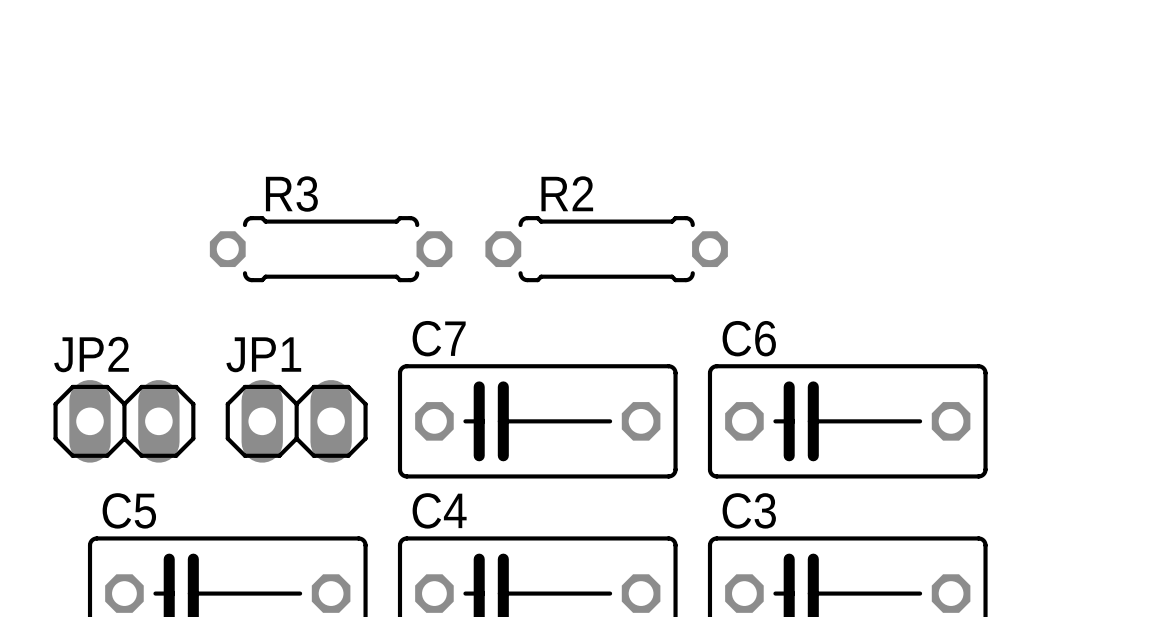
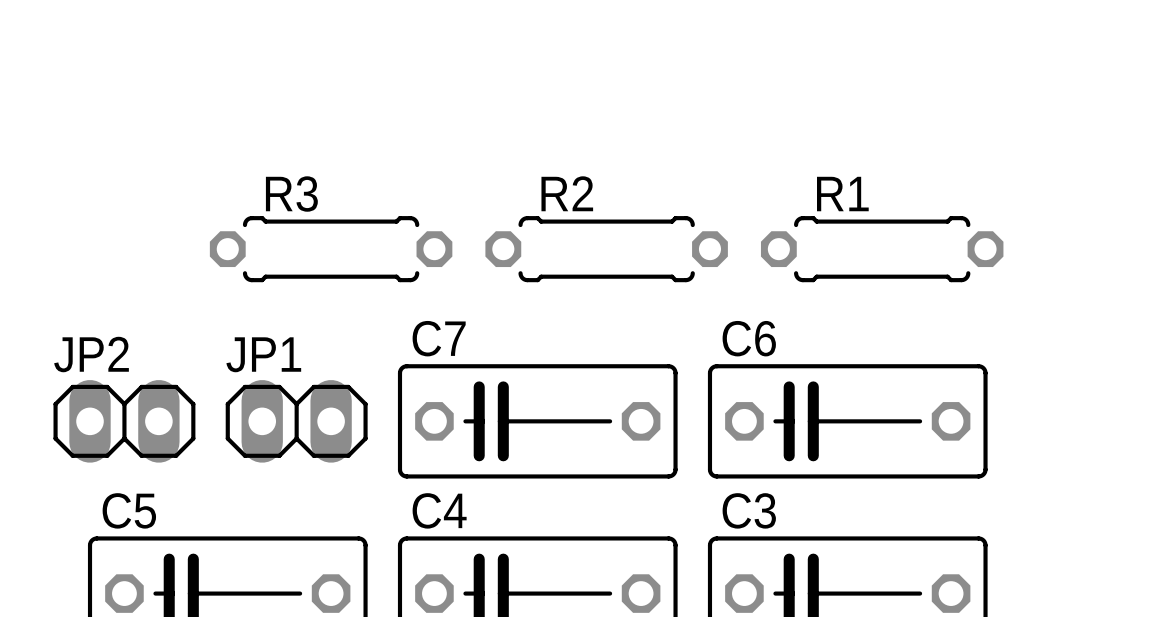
R1: none -> (882, 249)

